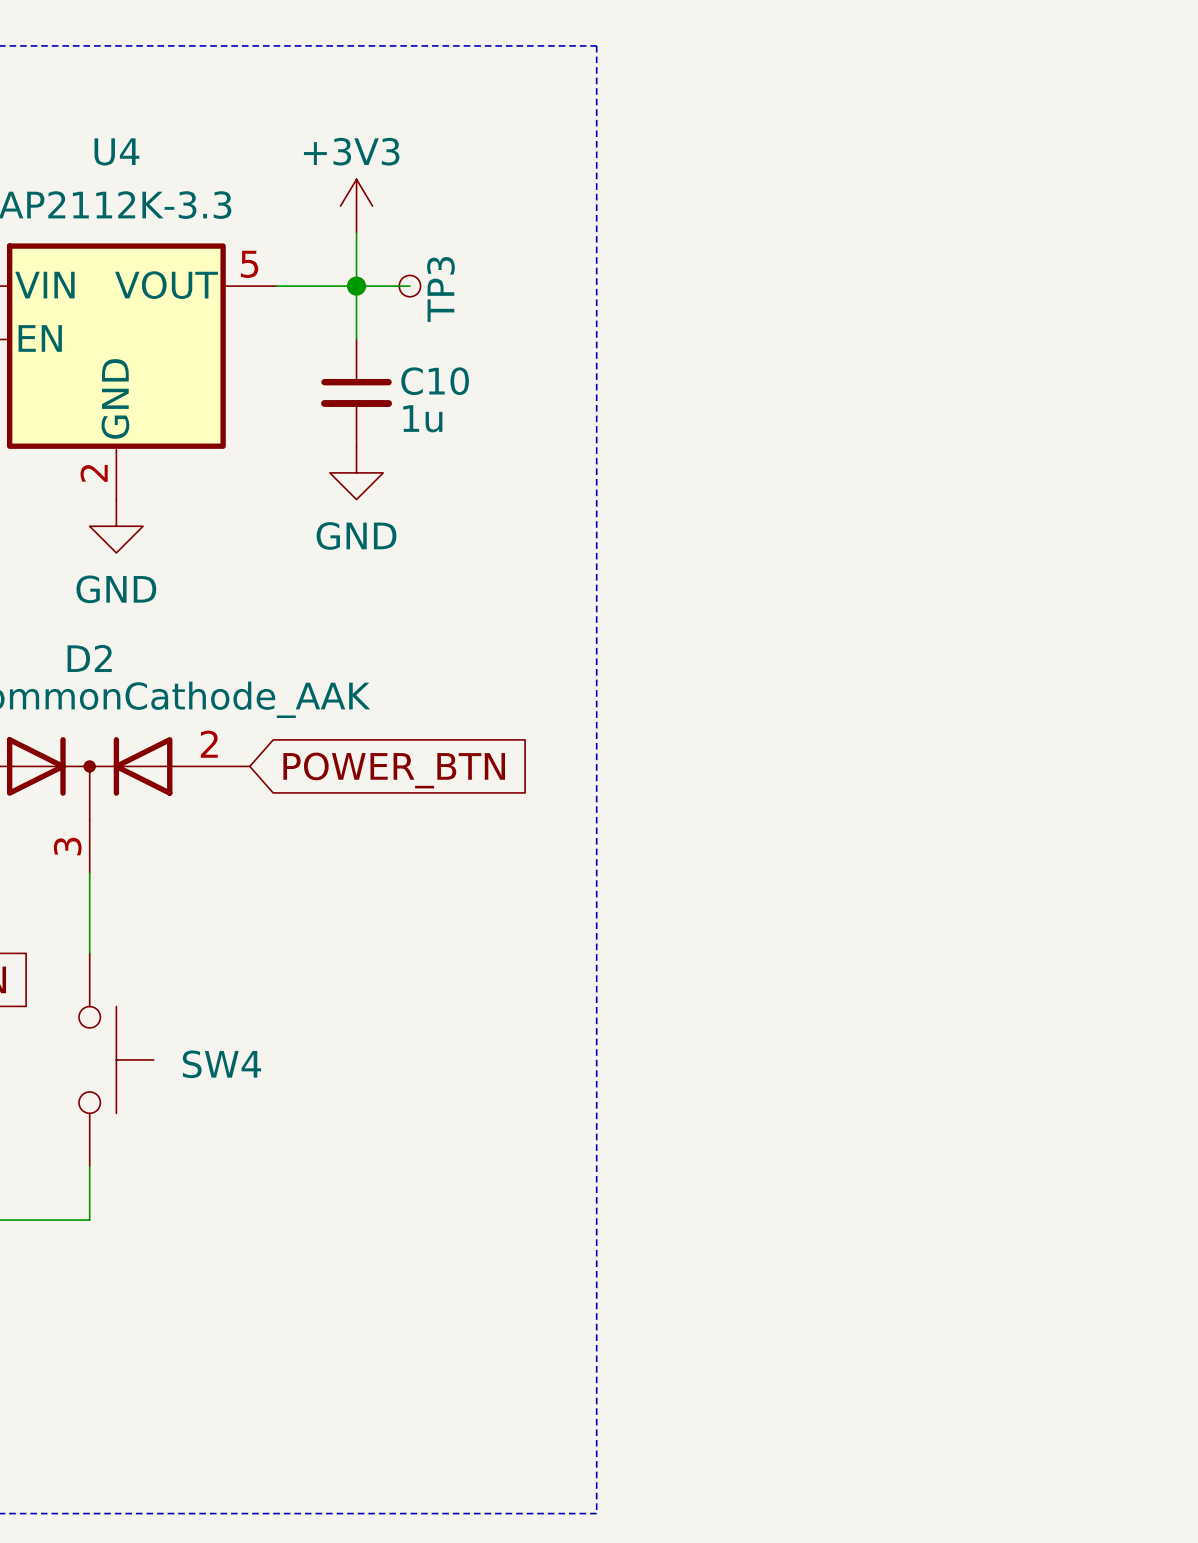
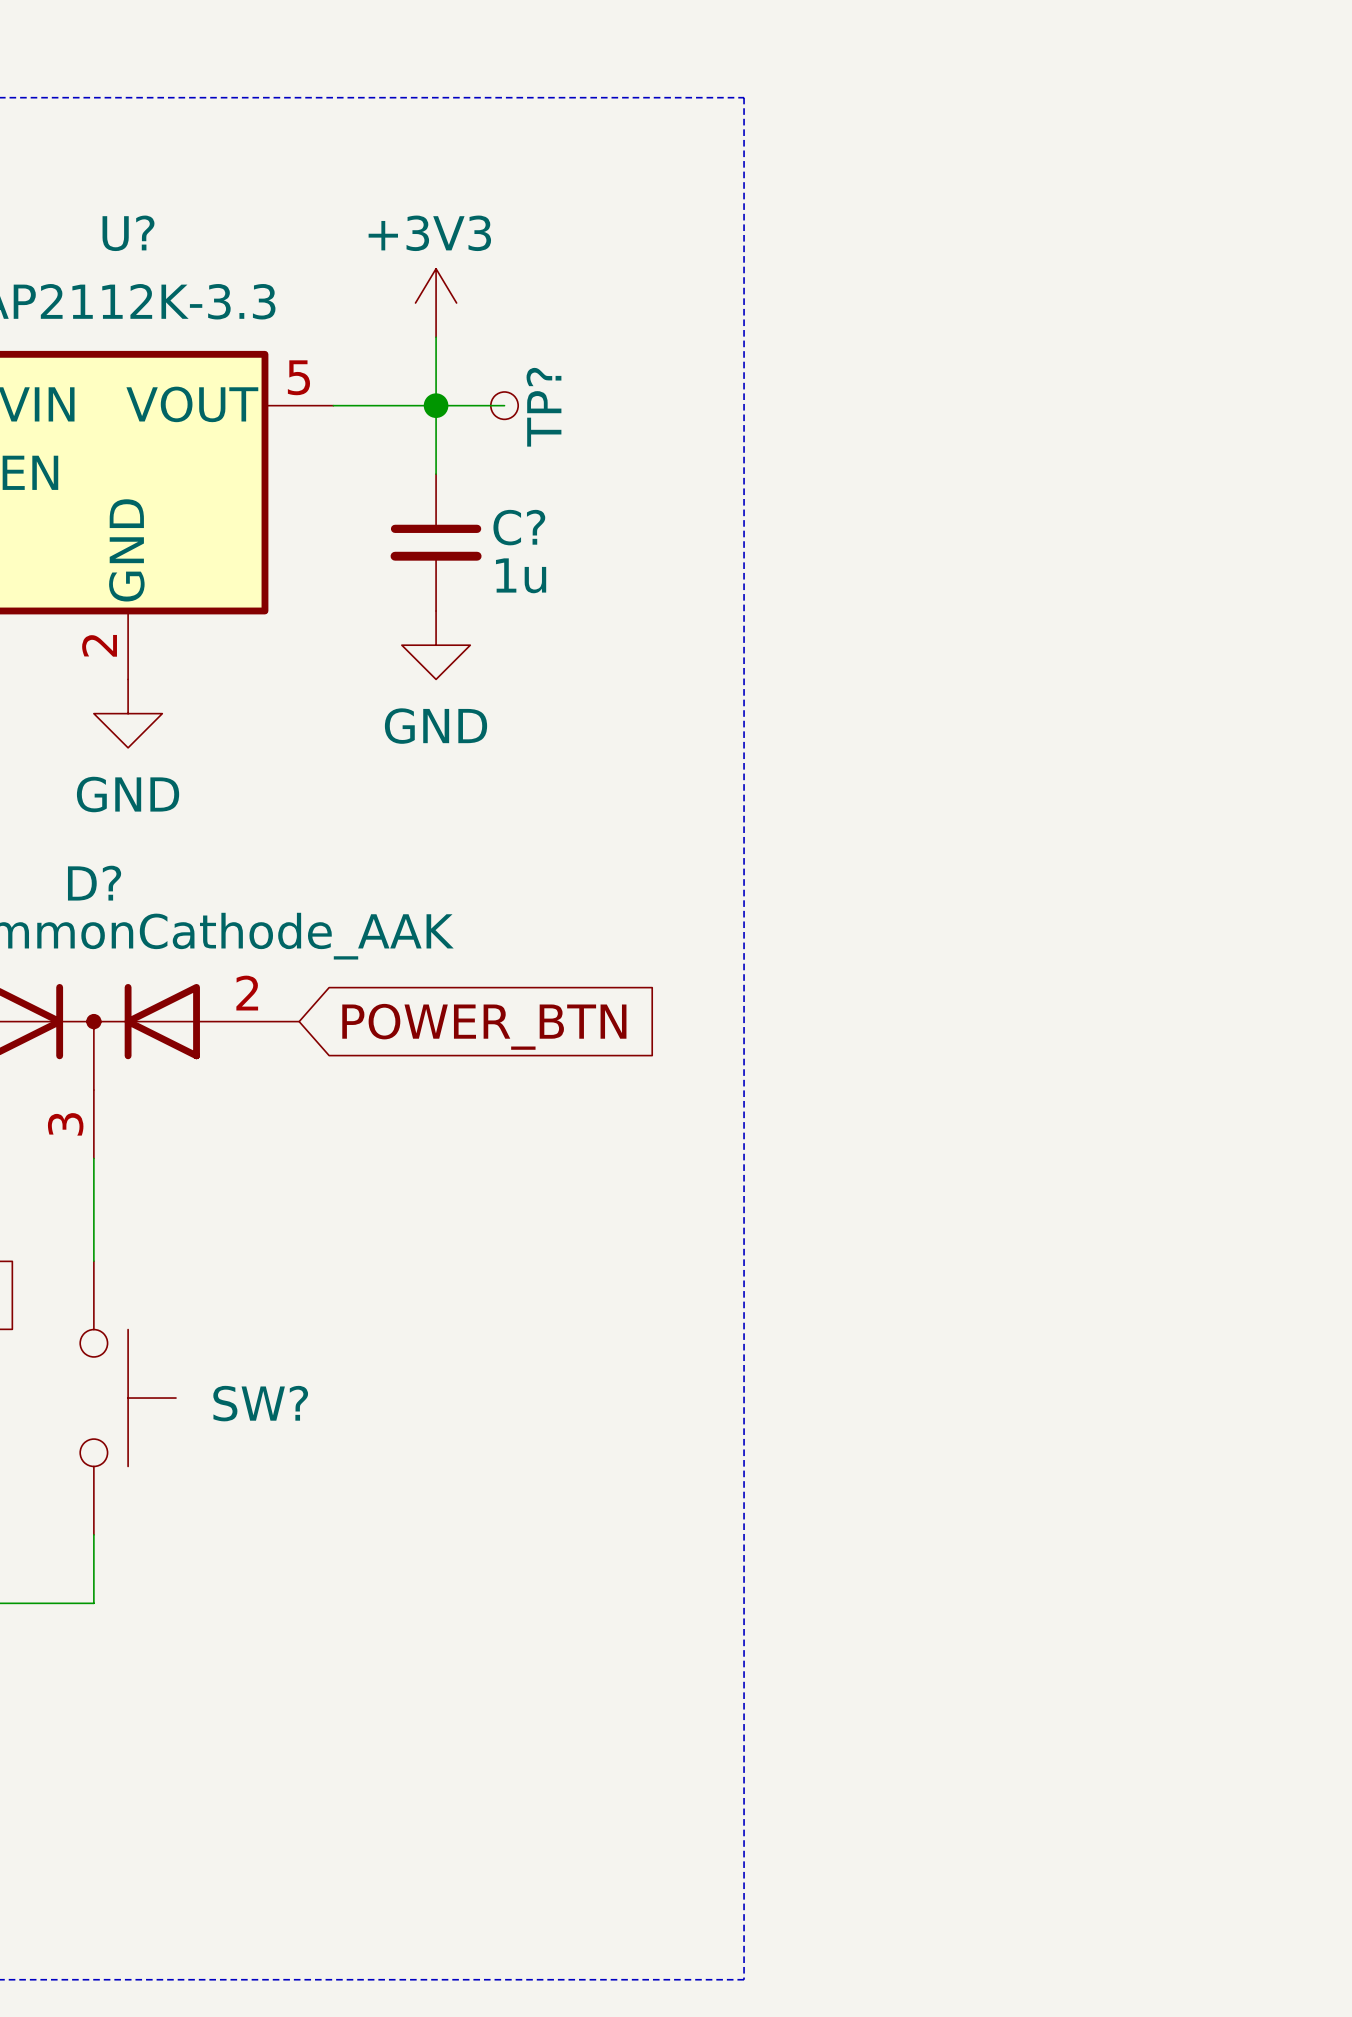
U4 name: U4 (116, 151) -> U? (128, 233)
TP3 name: TP3 (440, 289) -> TP? (543, 407)
C10 name: C10 (435, 381) -> C? (519, 527)
D2 name: D2 (89, 658) -> D? (94, 883)
SW4 name: SW4 (221, 1064) -> SW? (260, 1403)

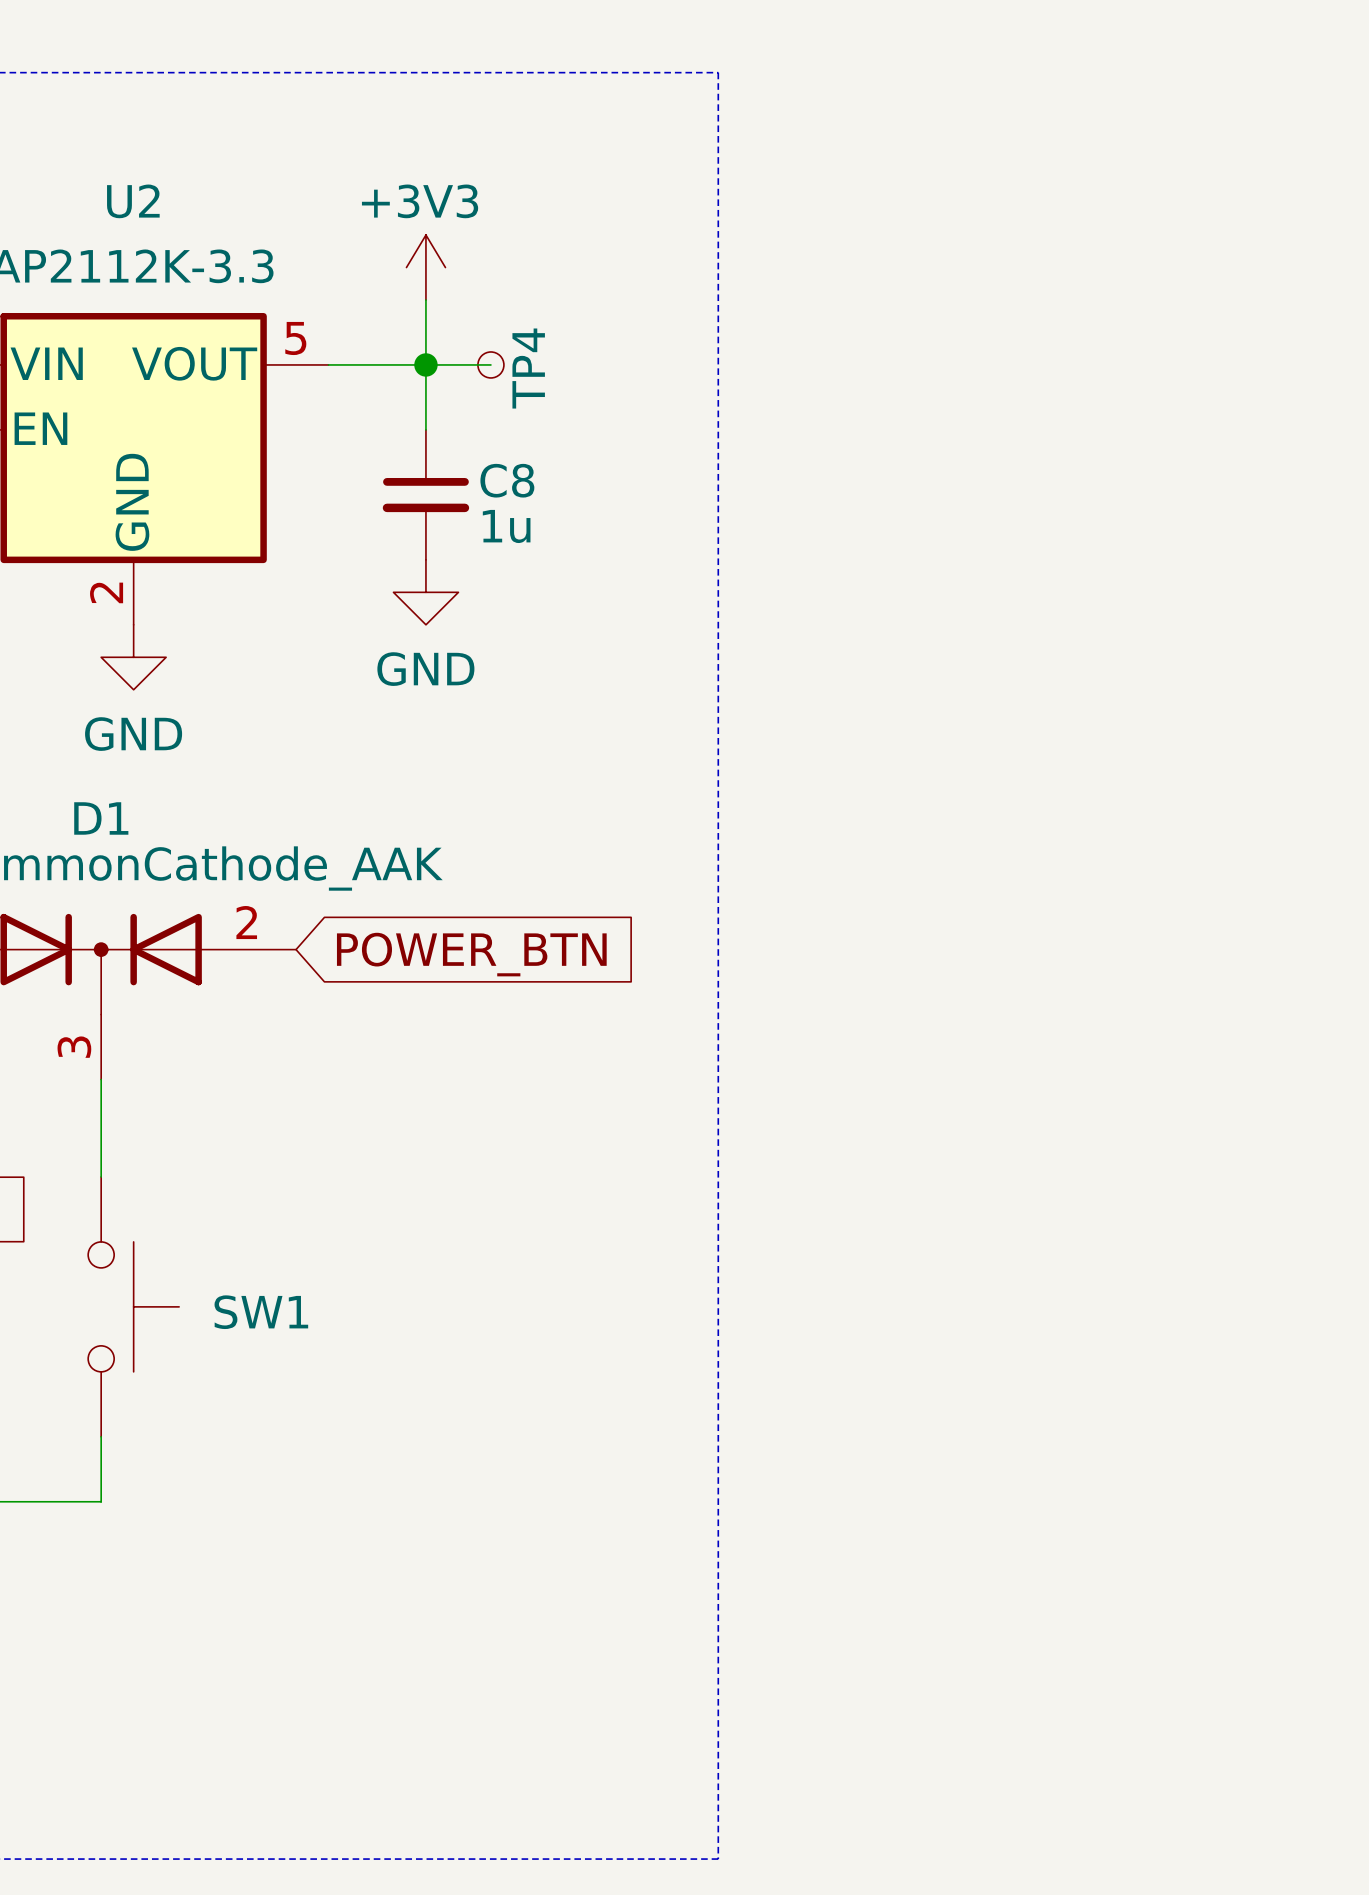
U? name: U? (128, 233) -> U2 (133, 201)
TP? name: TP? (543, 407) -> TP4 (528, 368)
C? name: C? (519, 527) -> C8 (507, 480)
D? name: D? (94, 883) -> D1 (101, 818)
SW? name: SW? (260, 1403) -> SW1 (261, 1312)

